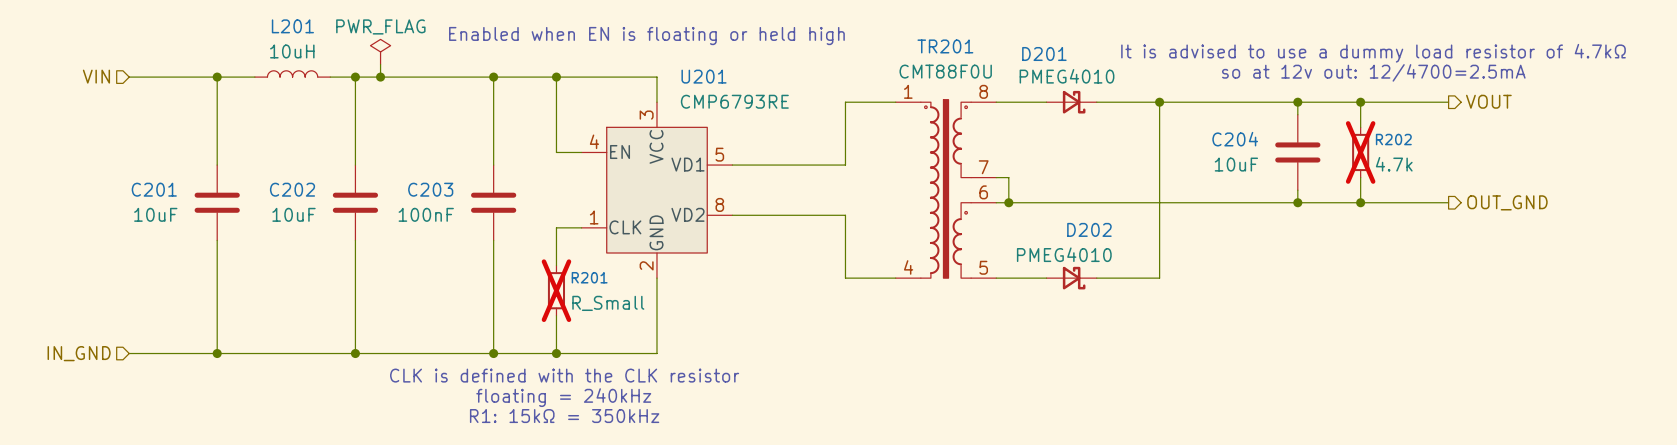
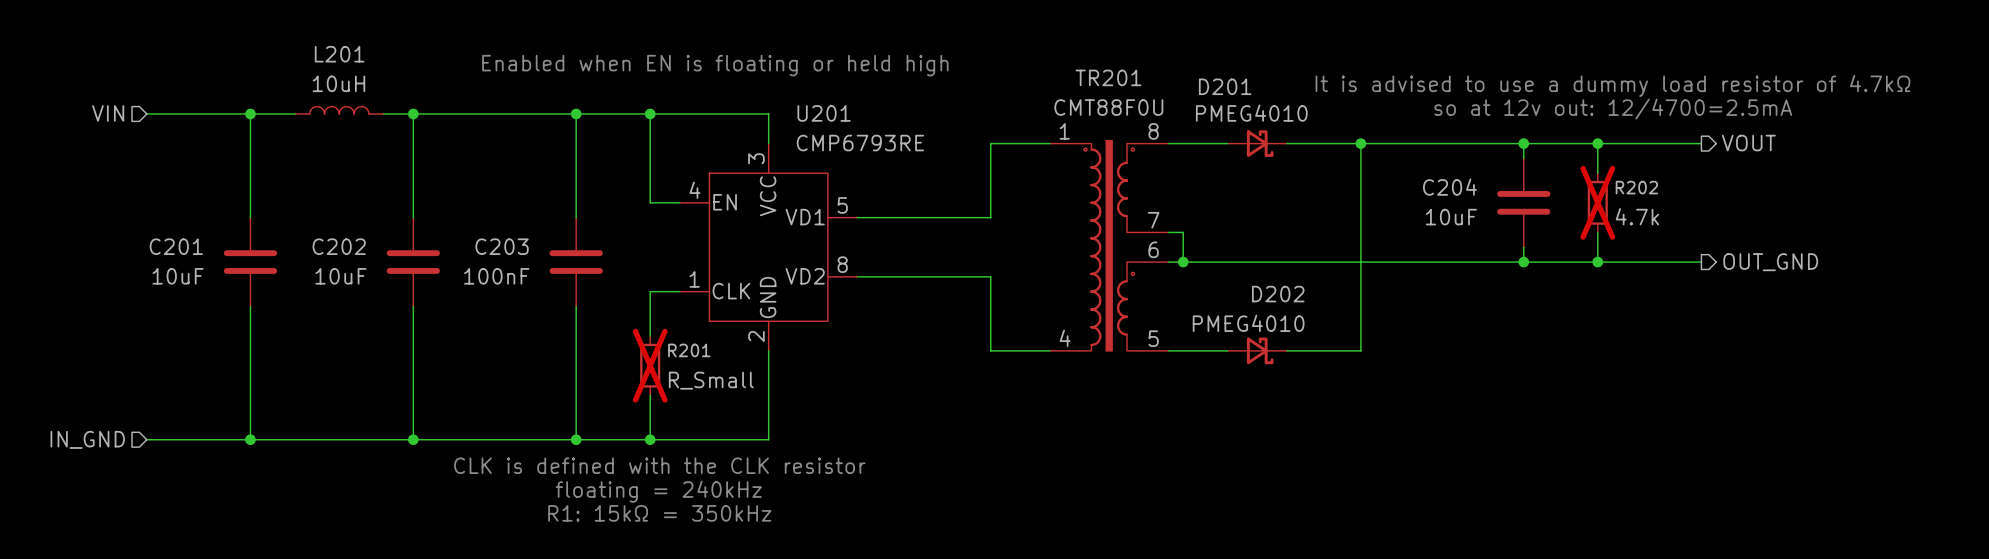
text position: Enabled when EN is floating or held high (646, 36) -> Enabled when EN is floating or held high (715, 65)
power symbol: PWR_FLAG (380, 51) -> none
wire: (380, 64) (380, 77) -> none
junction: (380, 77) -> none

